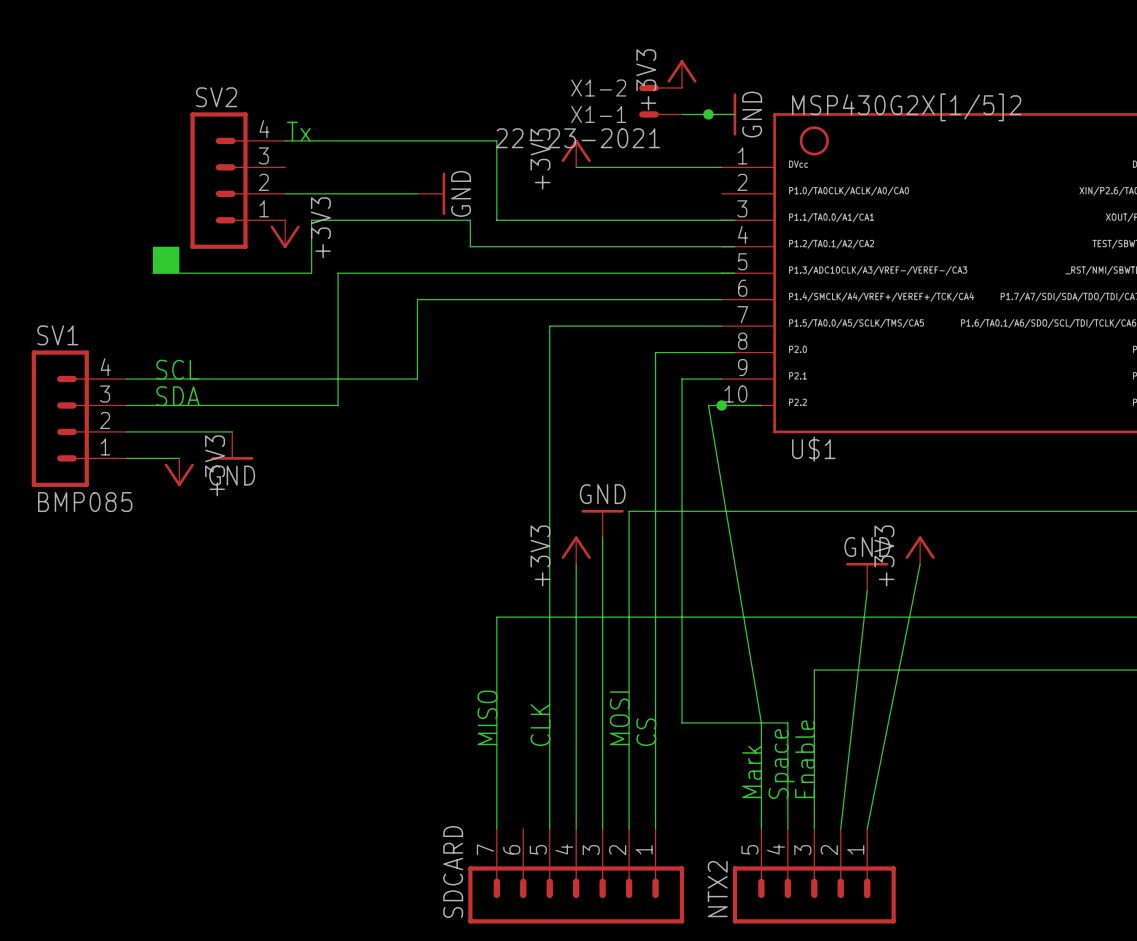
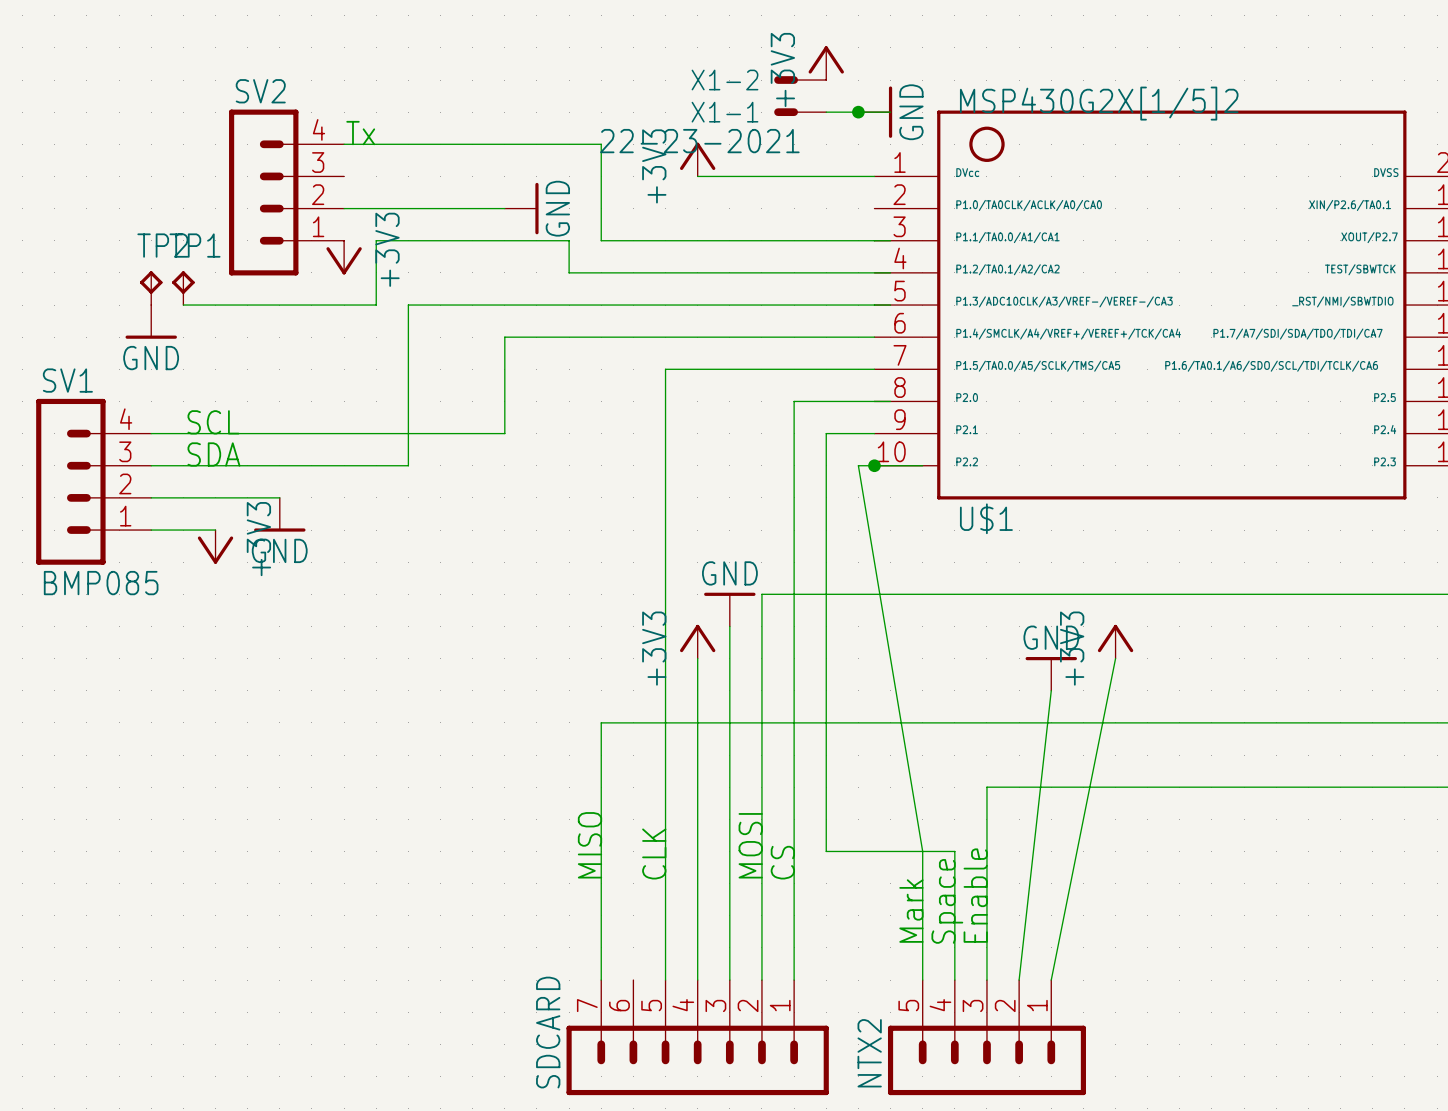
drawing: [152, 246, 180, 274] -> none
TP2: none -> (151, 288)
TP1: none -> (183, 288)
power symbol: none -> GND (151, 321)

